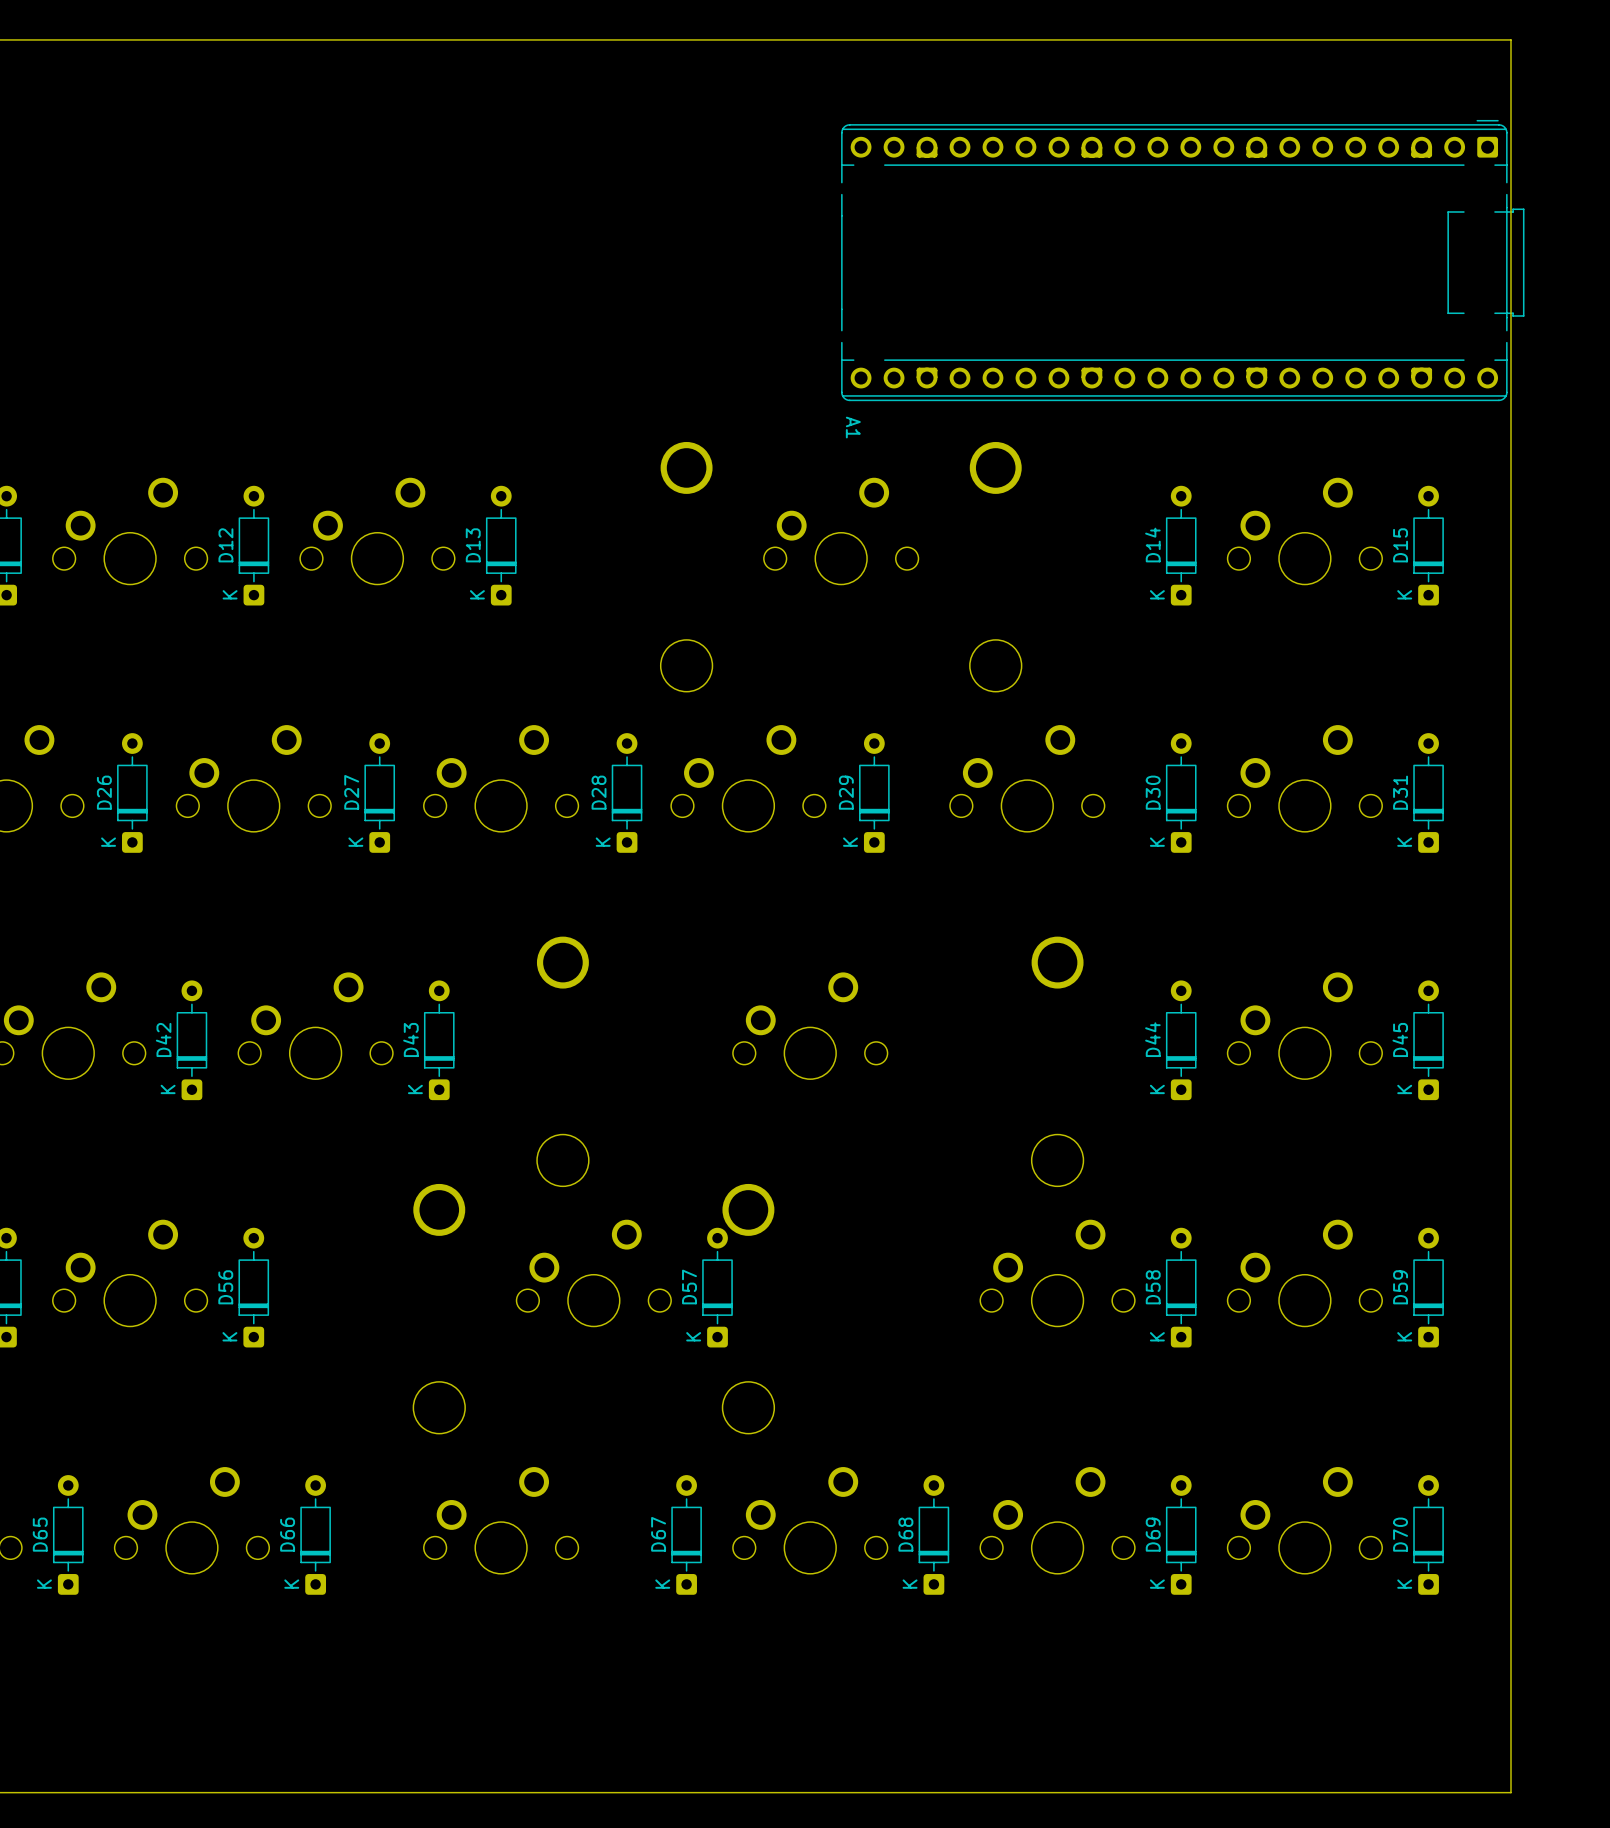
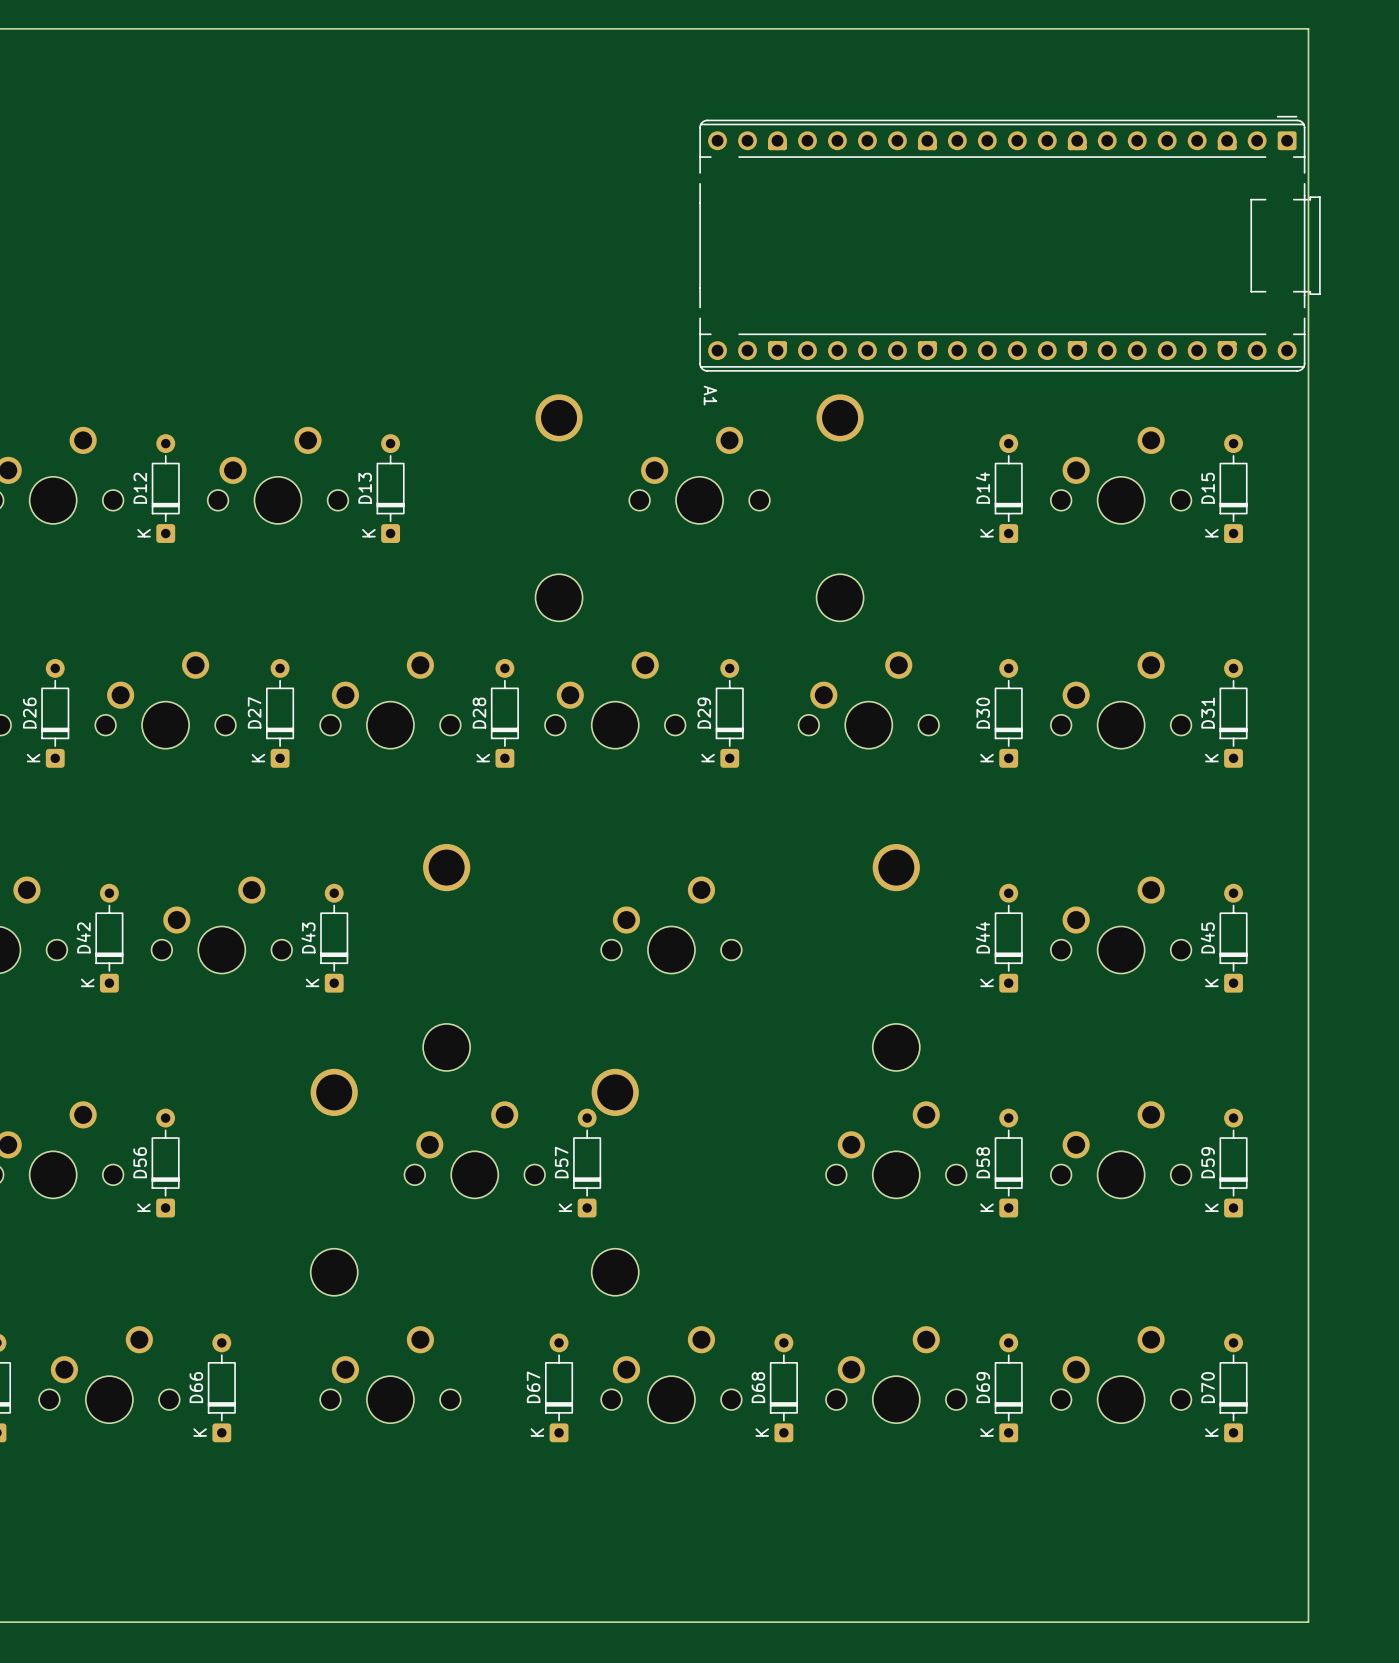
A1 footprint: [841, 119, 1525, 402] -> [699, 115, 1321, 372]

